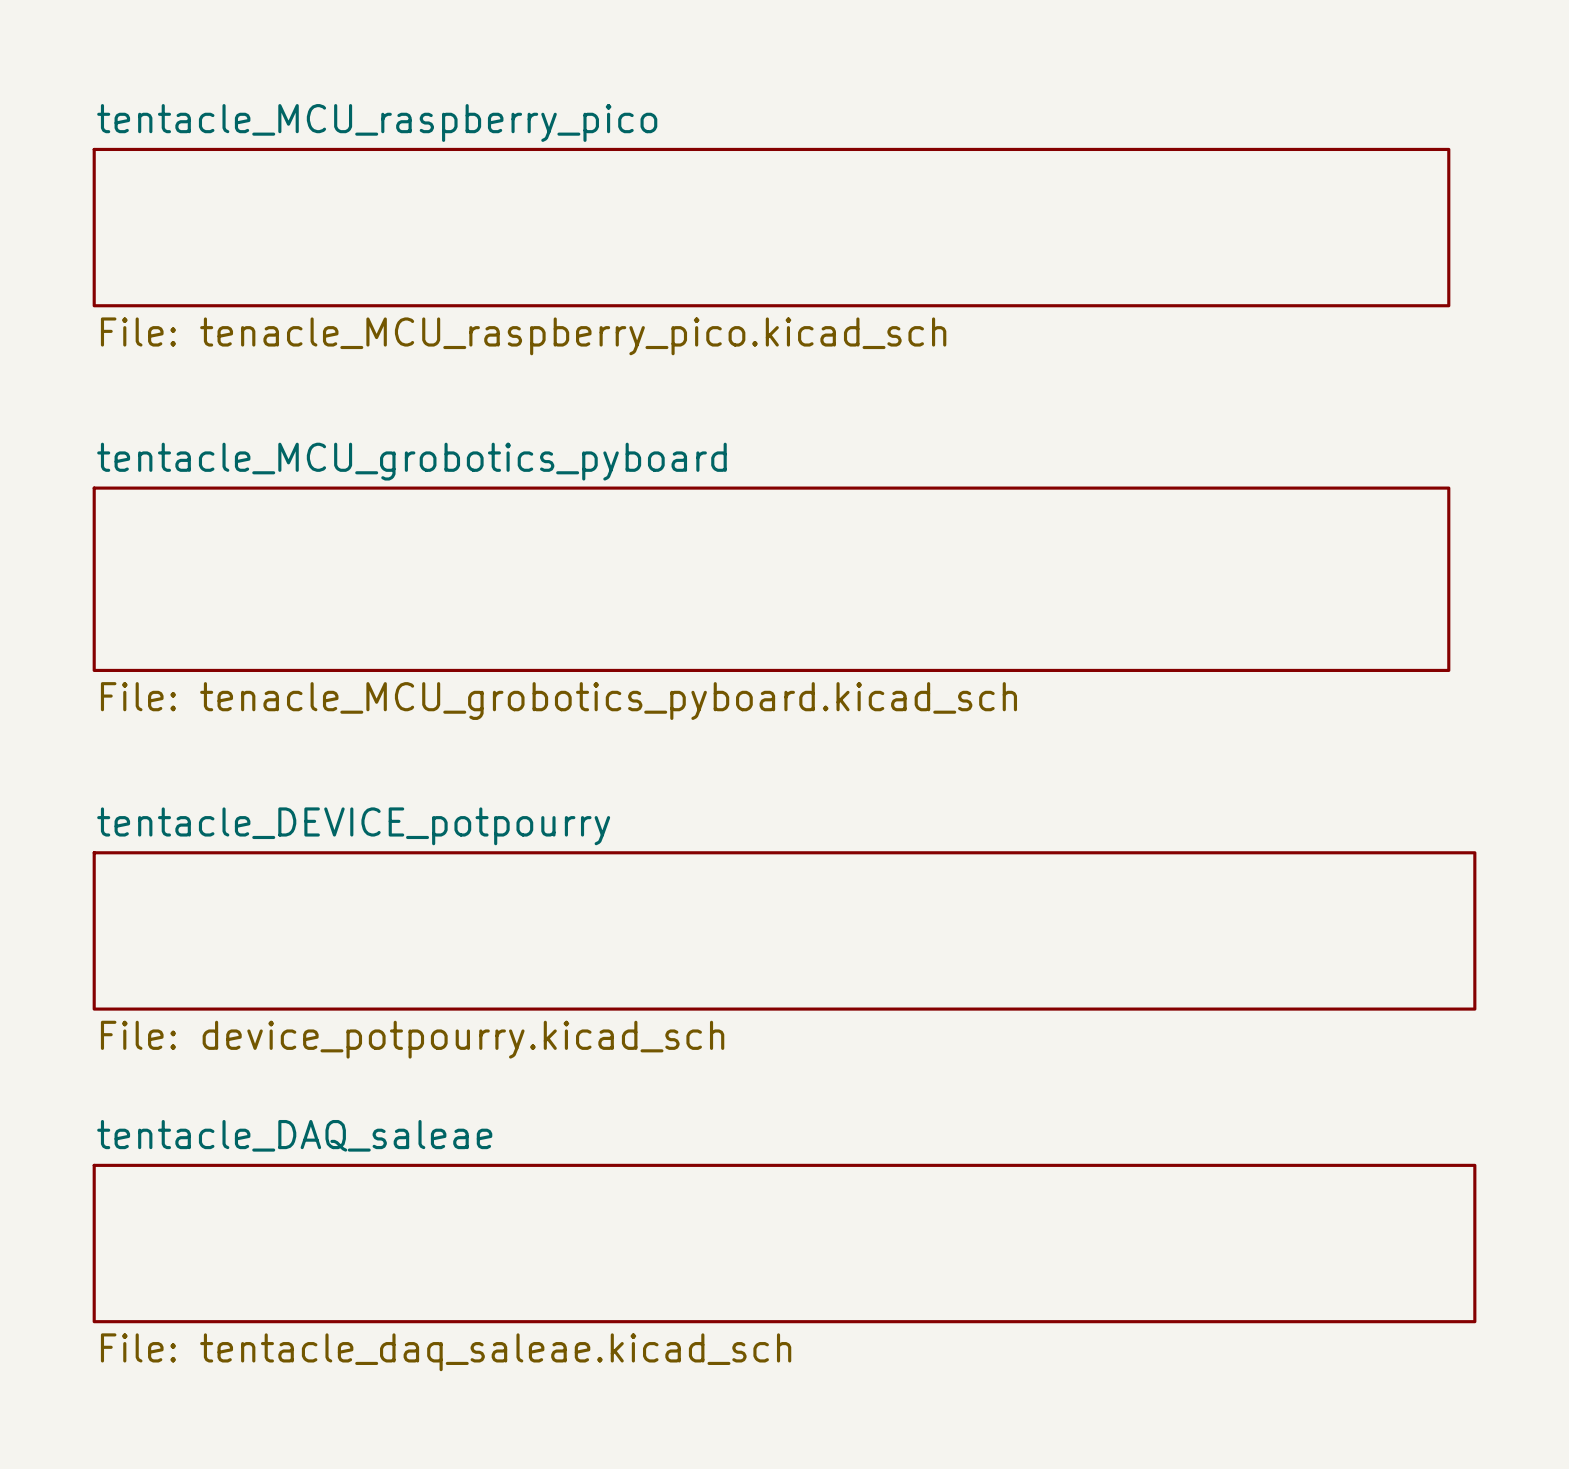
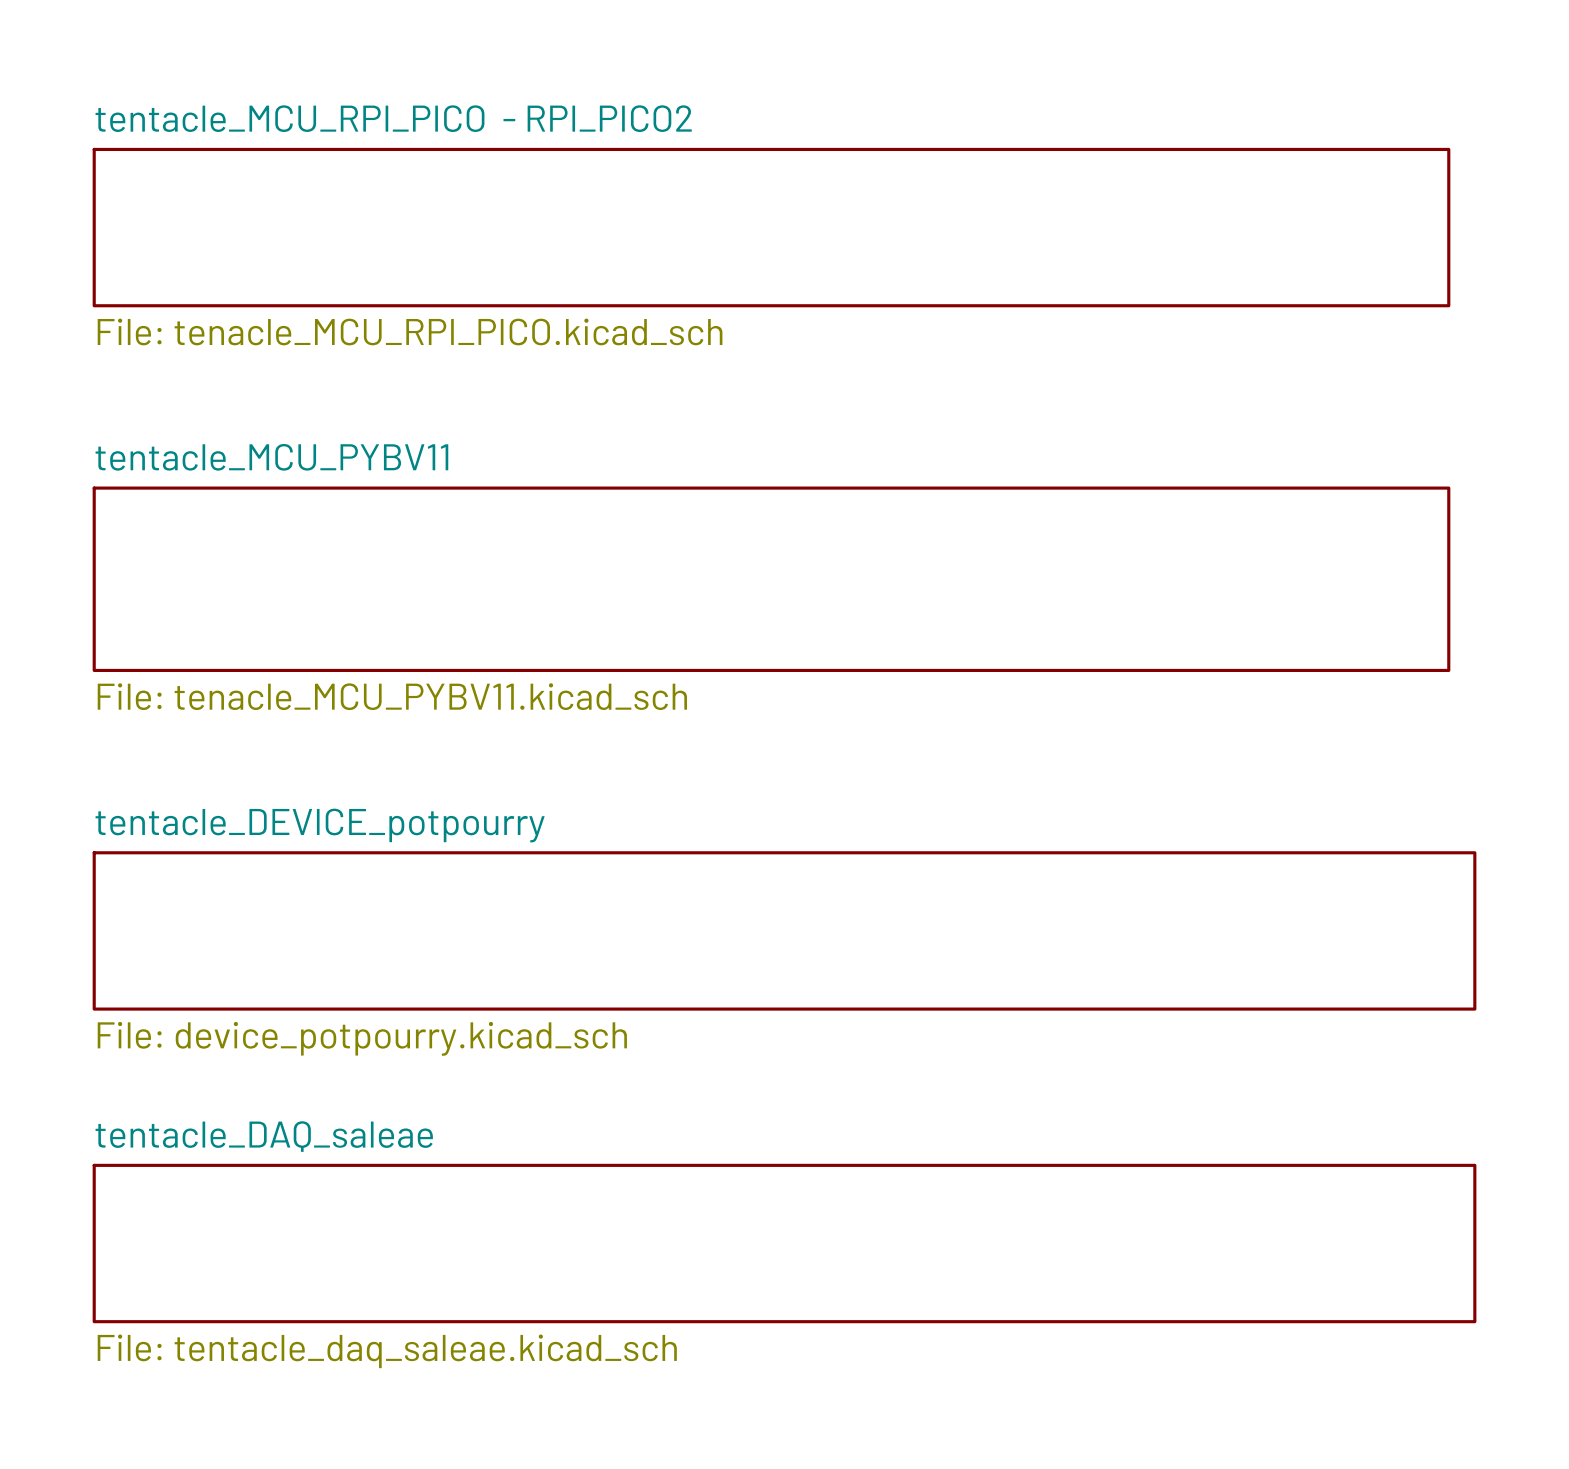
sheet tentacle_MCU_raspberry_pico name: tentacle_MCU_raspberry_pico (377, 122) -> tentacle_MCU_RPI_PICO - RPI_PICO2 (393, 118)
sheet tentacle_MCU_raspberry_pico value: File: tenacle_MCU_raspberry_pico.kicad_sch (523, 336) -> File: tenacle_MCU_RPI_PICO.kicad_sch (410, 331)
sheet tentacle_MCU_grobotics_pyboard name: tentacle_MCU_grobotics_pyboard (411, 461) -> tentacle_MCU_PYBV11 (271, 457)
sheet tentacle_MCU_grobotics_pyboard value: File: tenacle_MCU_grobotics_pyboard.kicad_sch (558, 701) -> File: tenacle_MCU_PYBV11.kicad_sch (392, 696)

